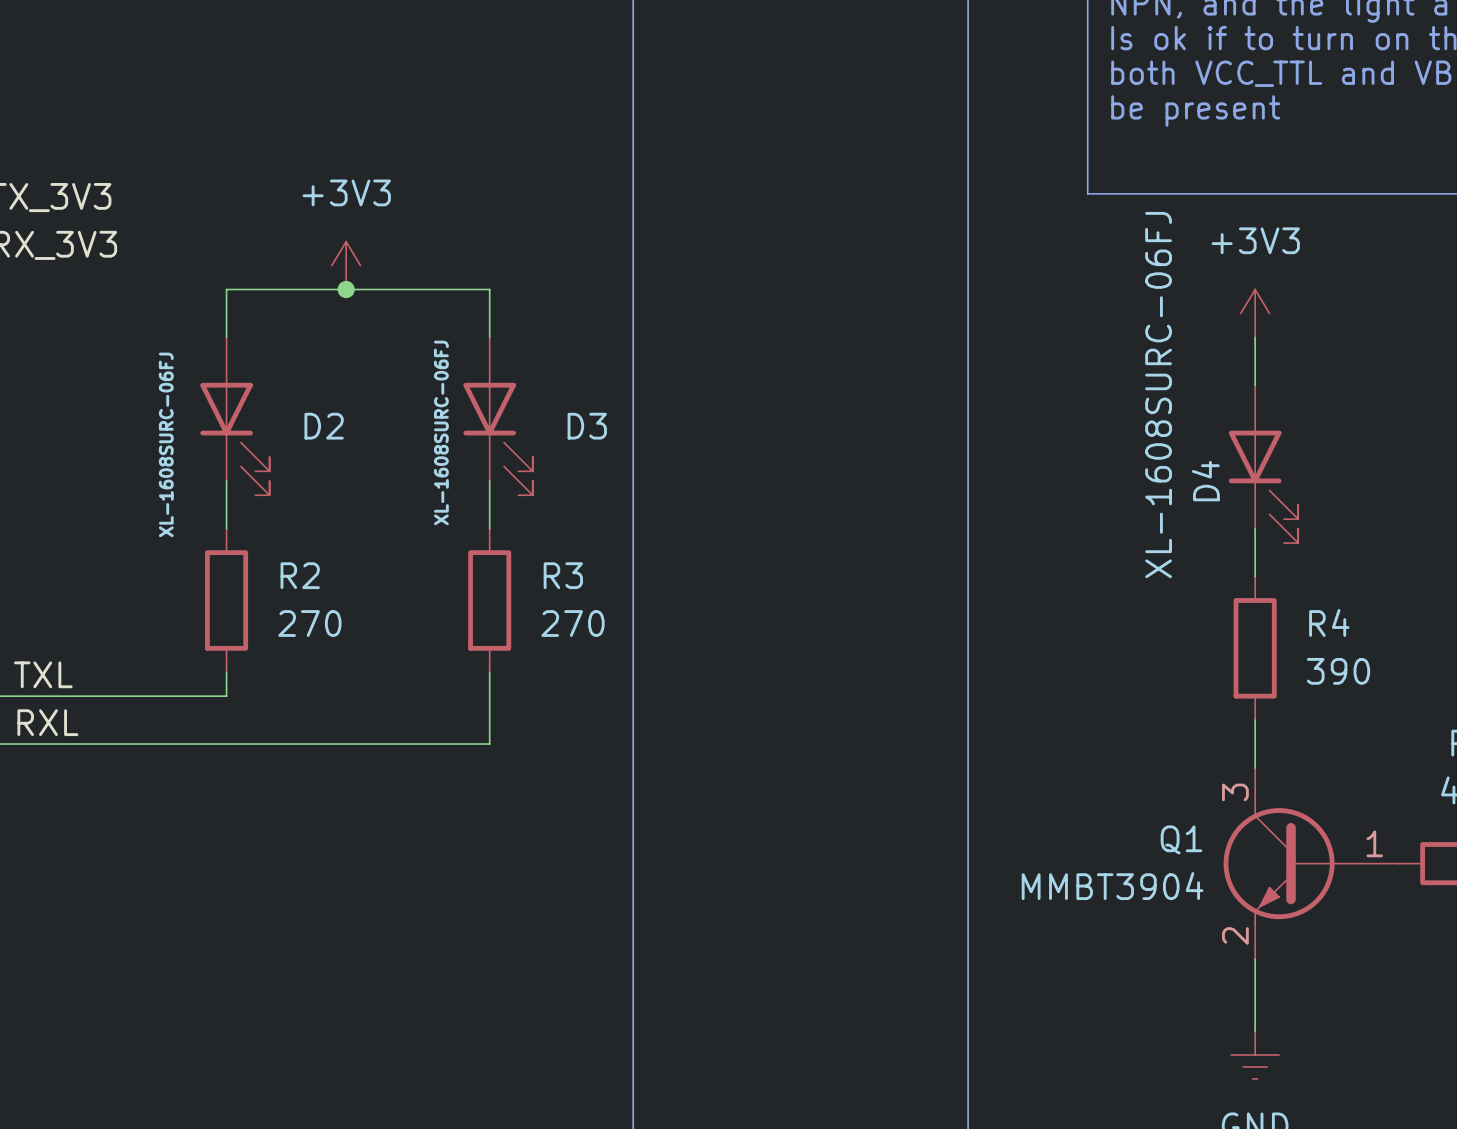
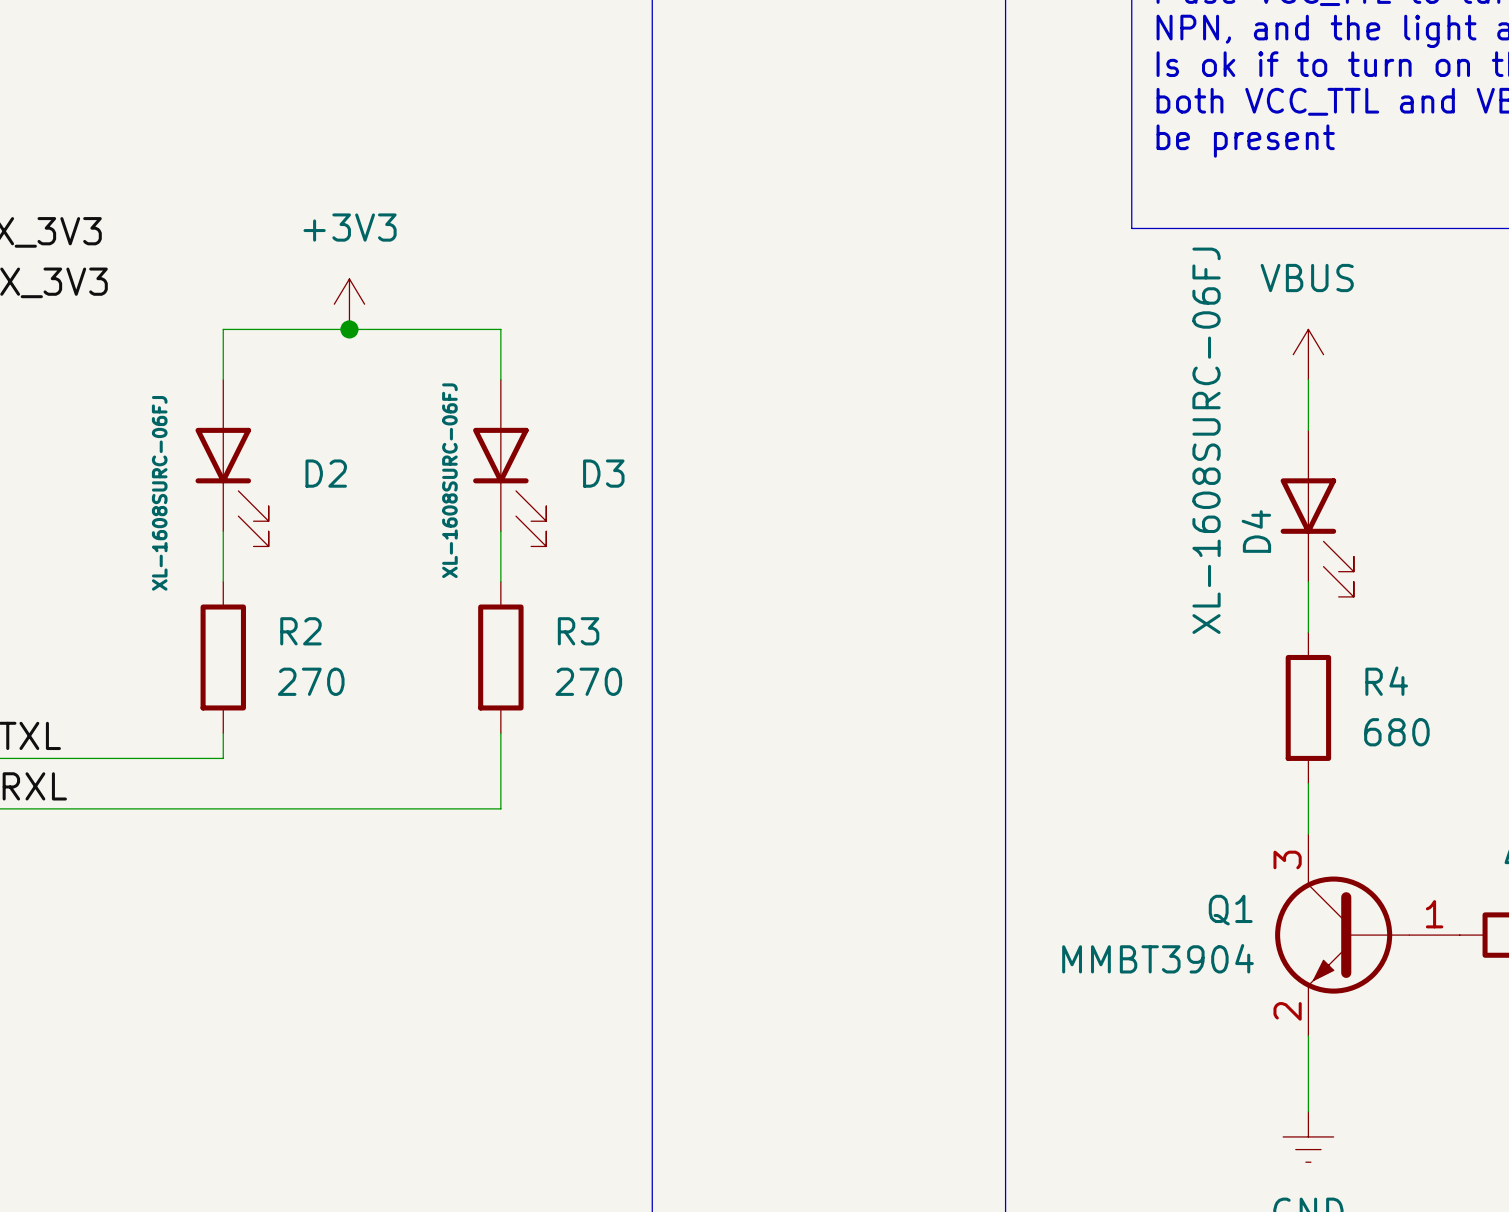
power symbol: +3V3 (1255, 313) -> VBUS (1308, 354)
R4 value: 390 (1338, 671) -> 680 (1396, 732)

